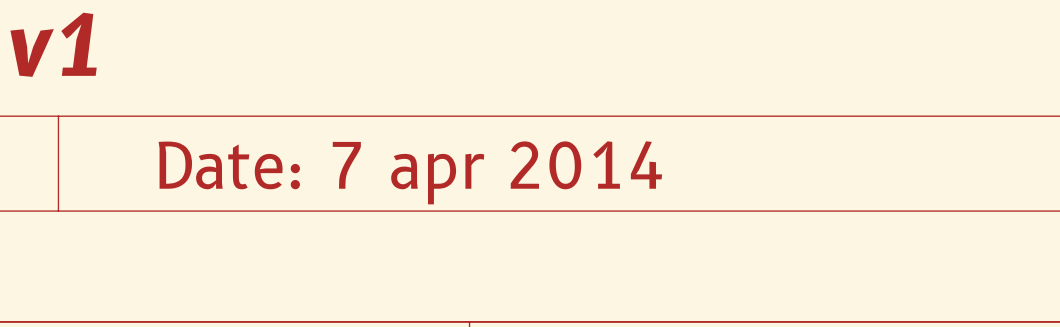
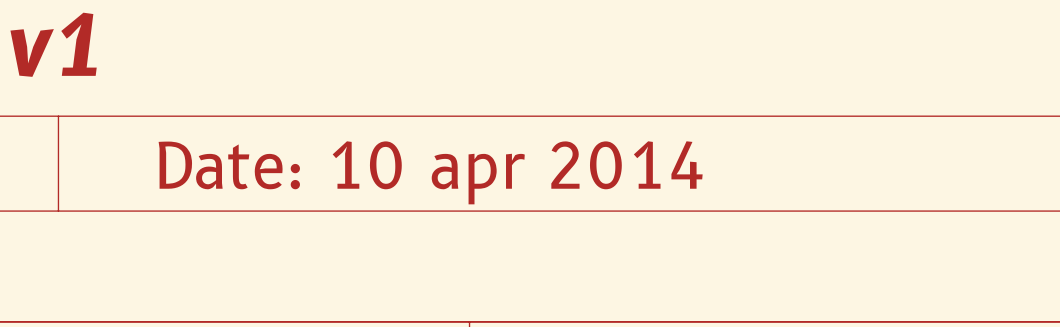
title block: Date: 7 apr 2014 (410, 172) -> Date: 10 apr 2014 (430, 172)

